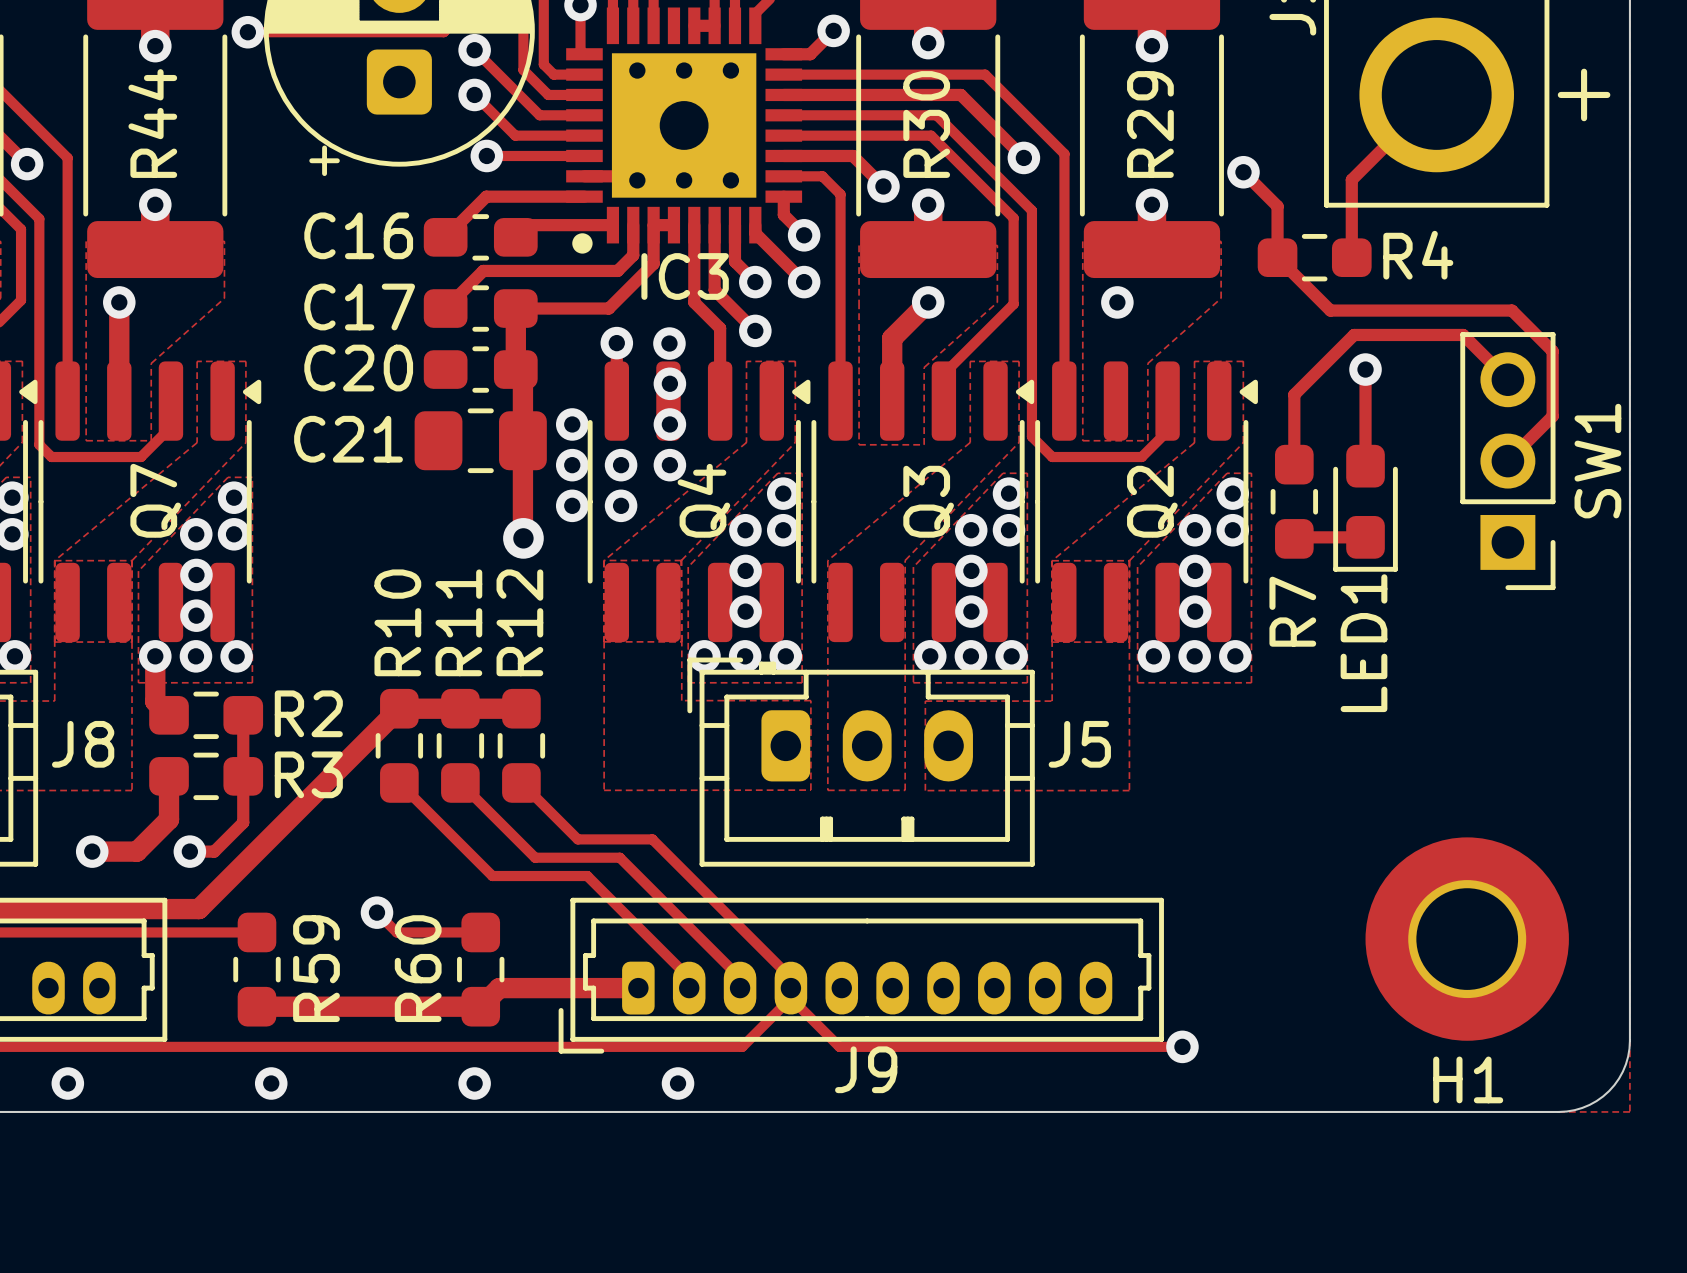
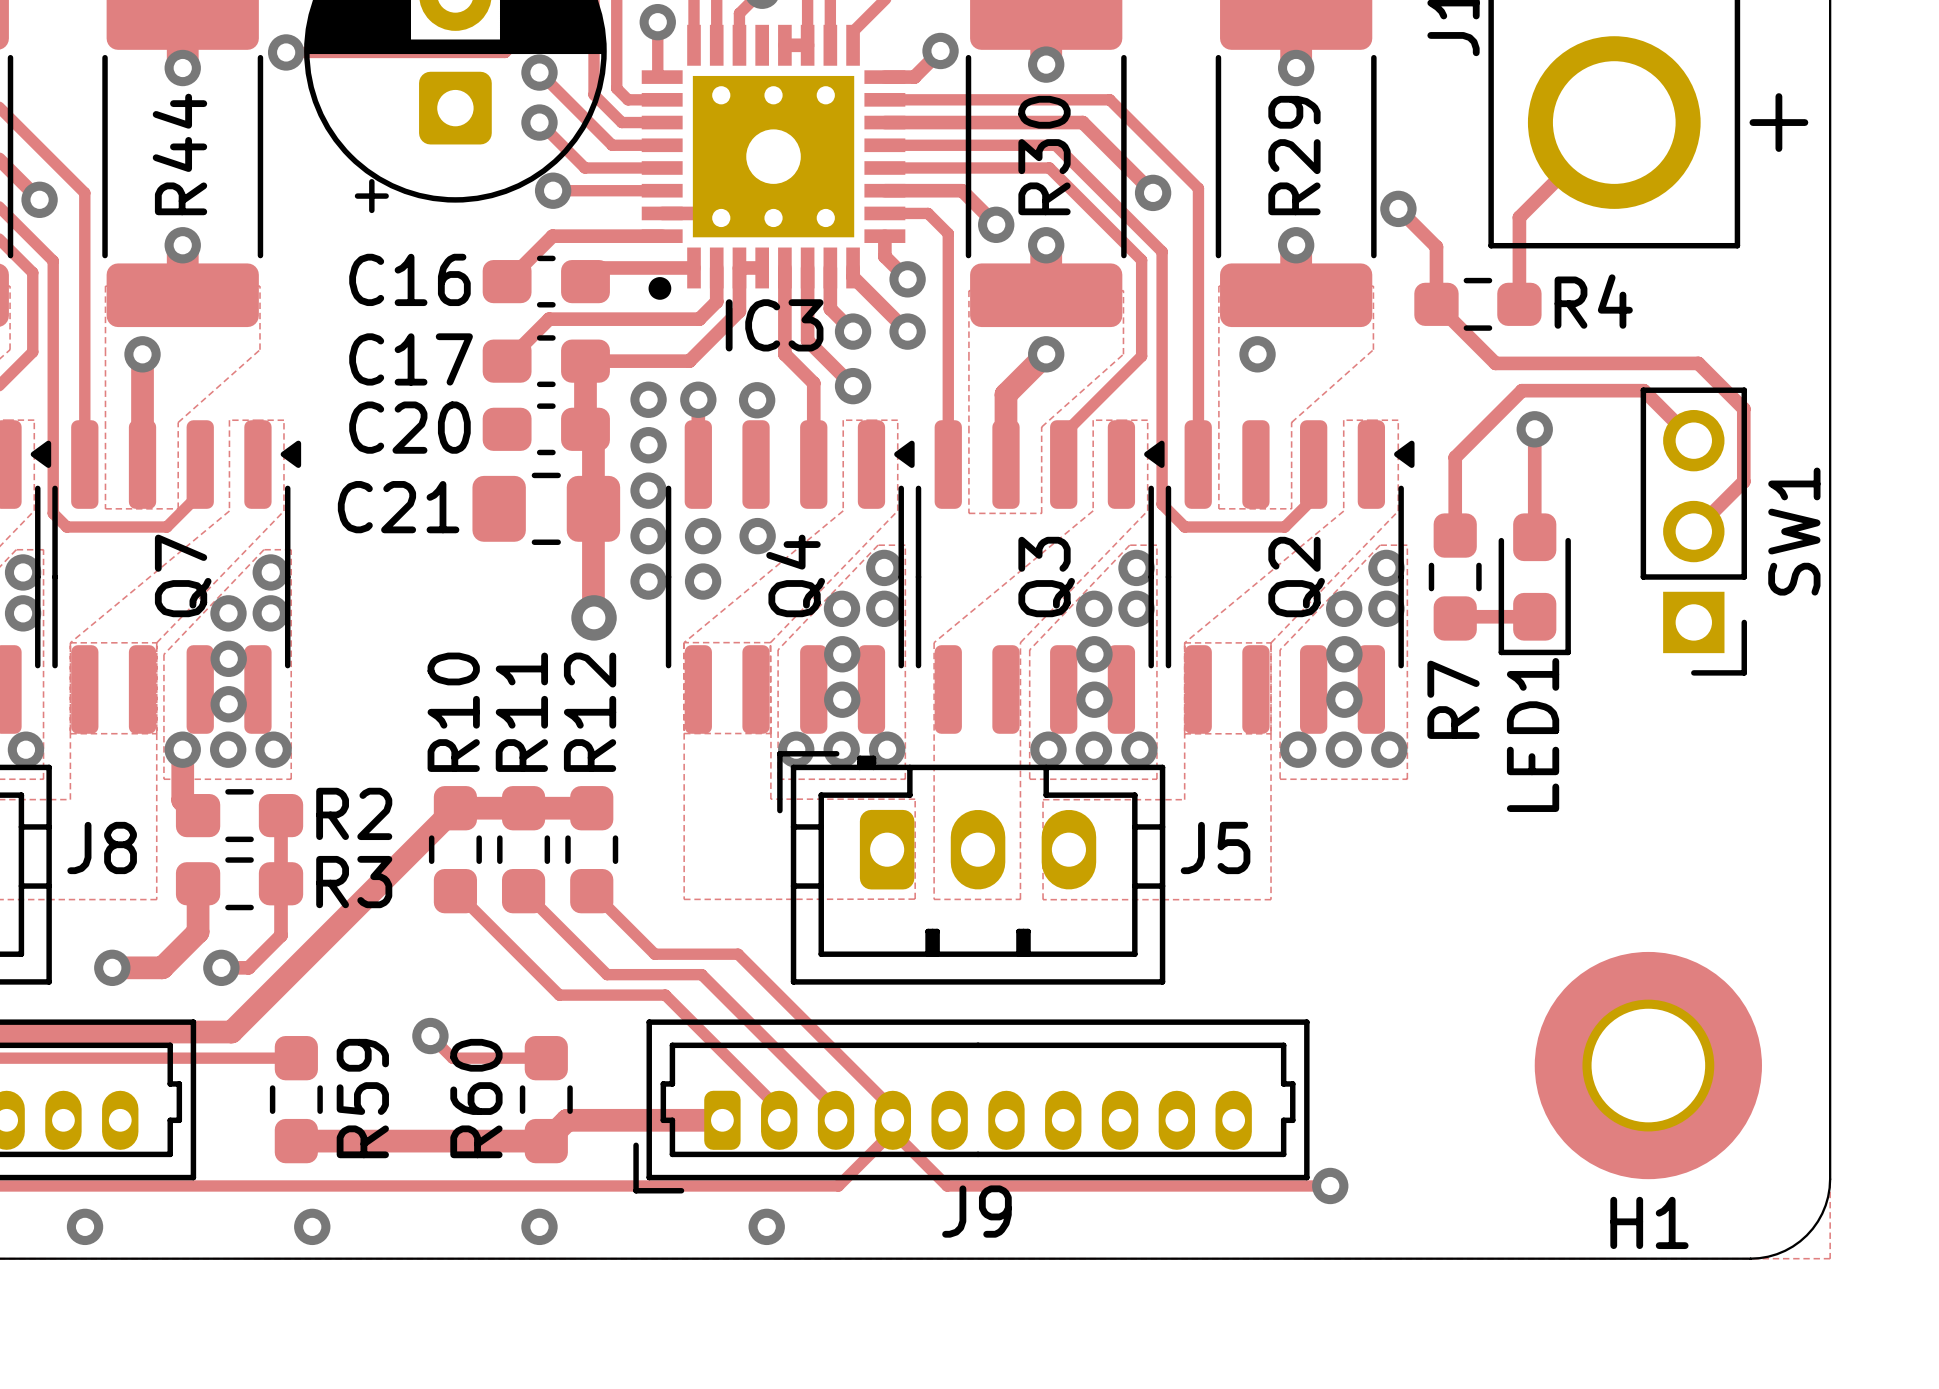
via: none -> (648, 399)
via: none -> (648, 445)
via: (669, 383) -> none
via: (669, 424) -> none

